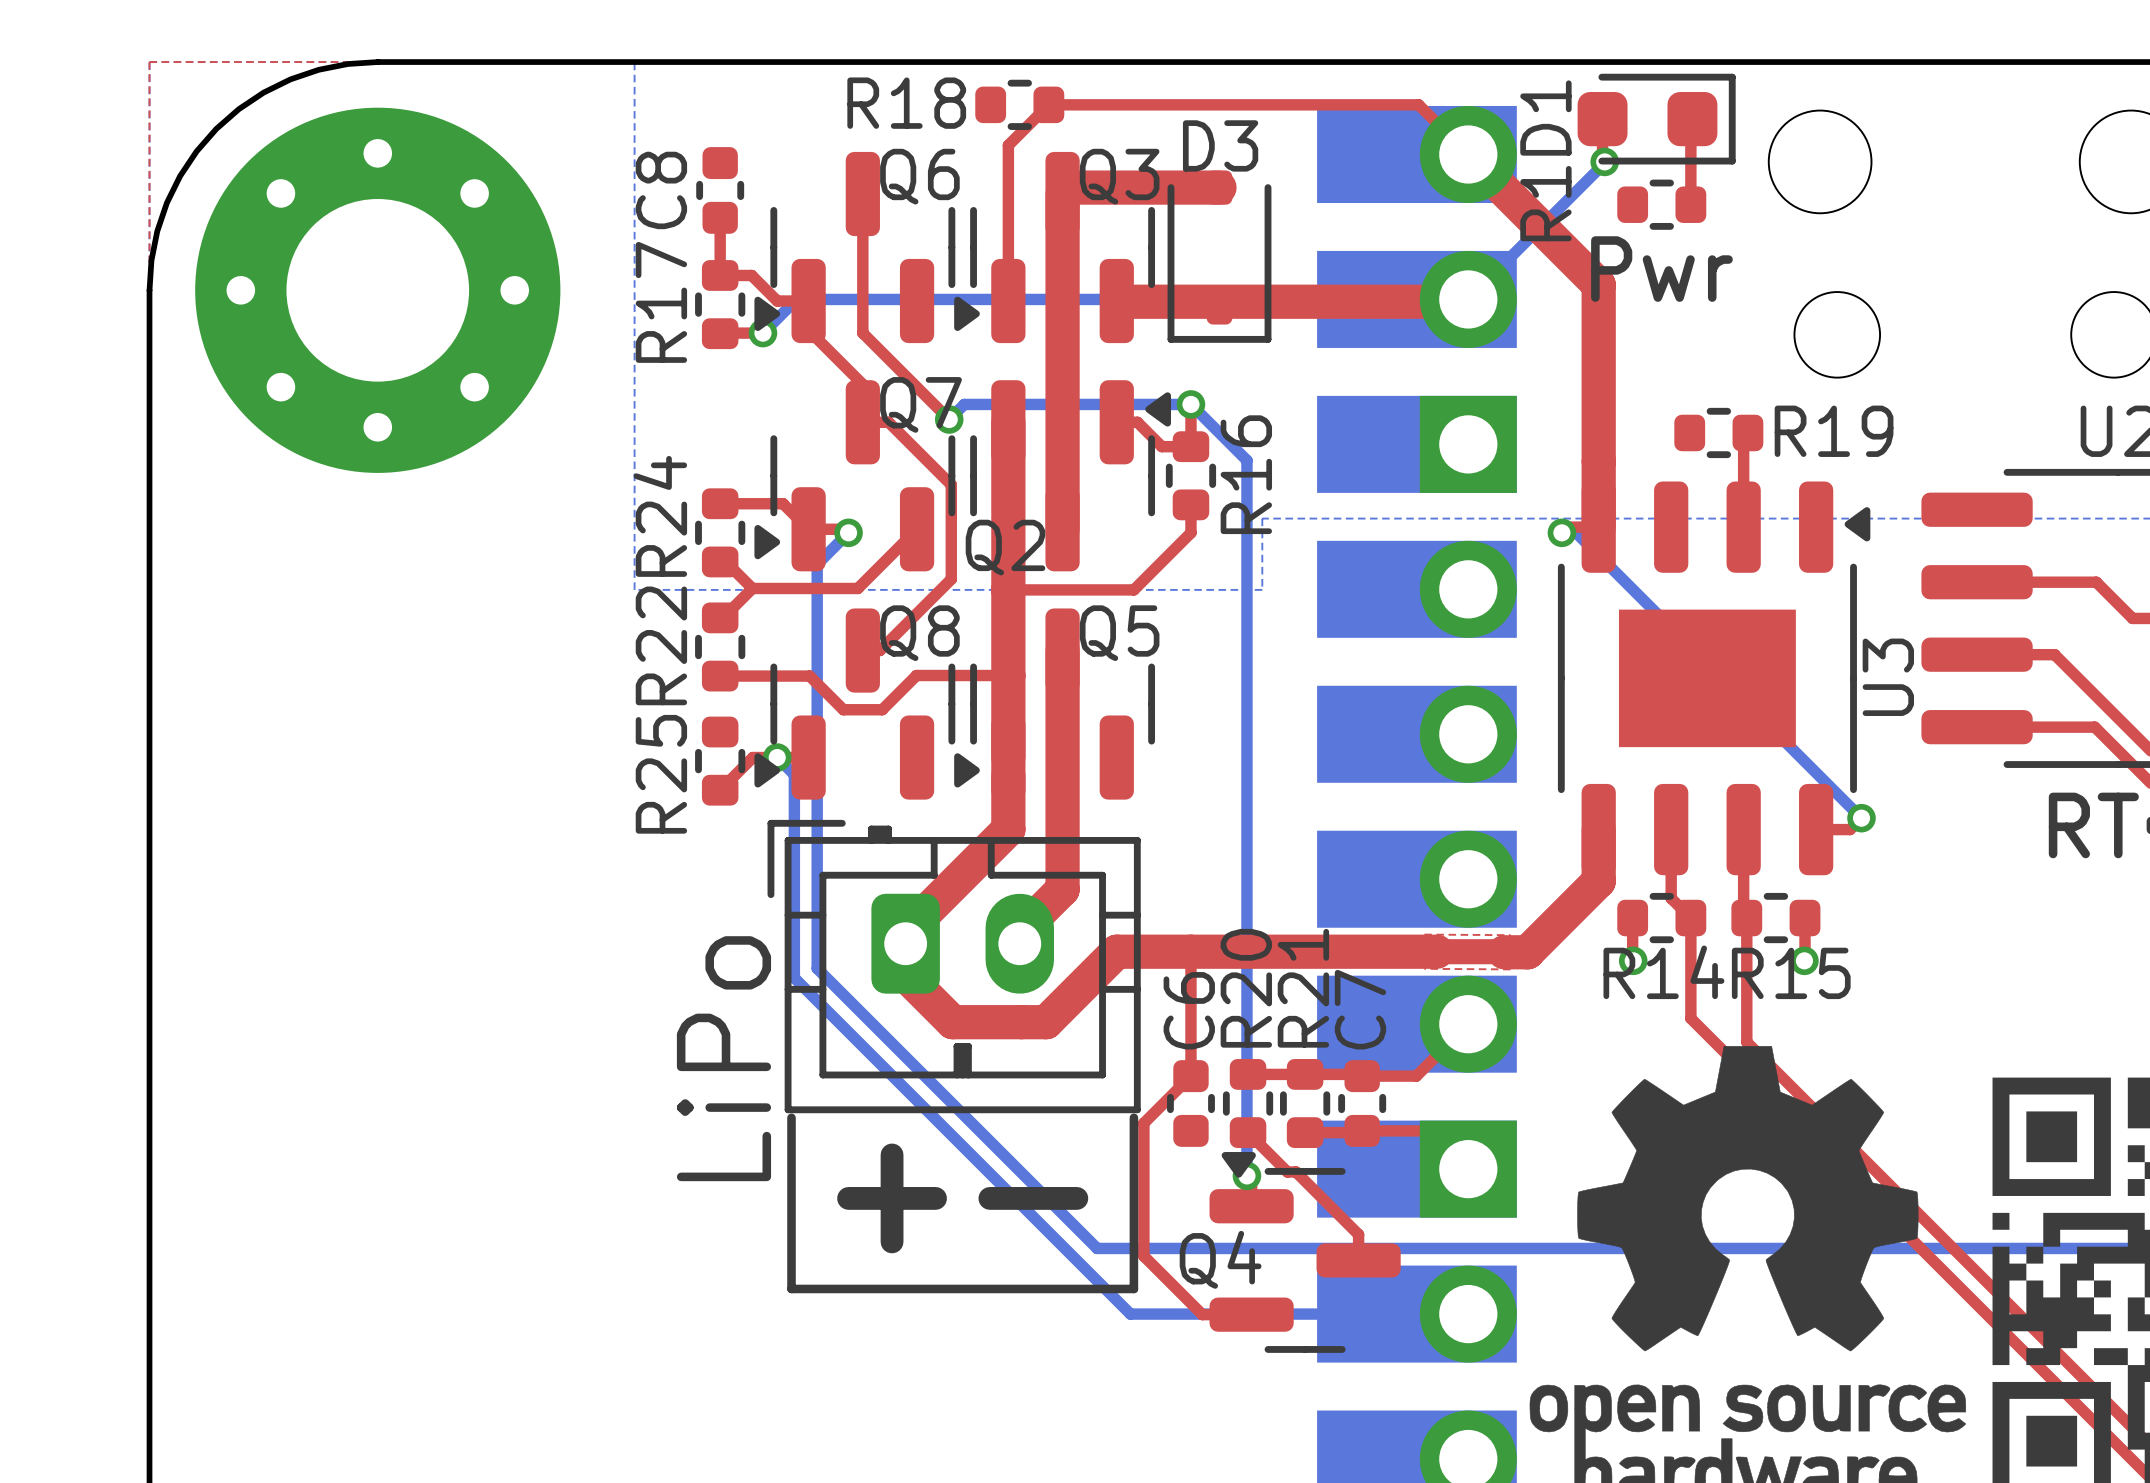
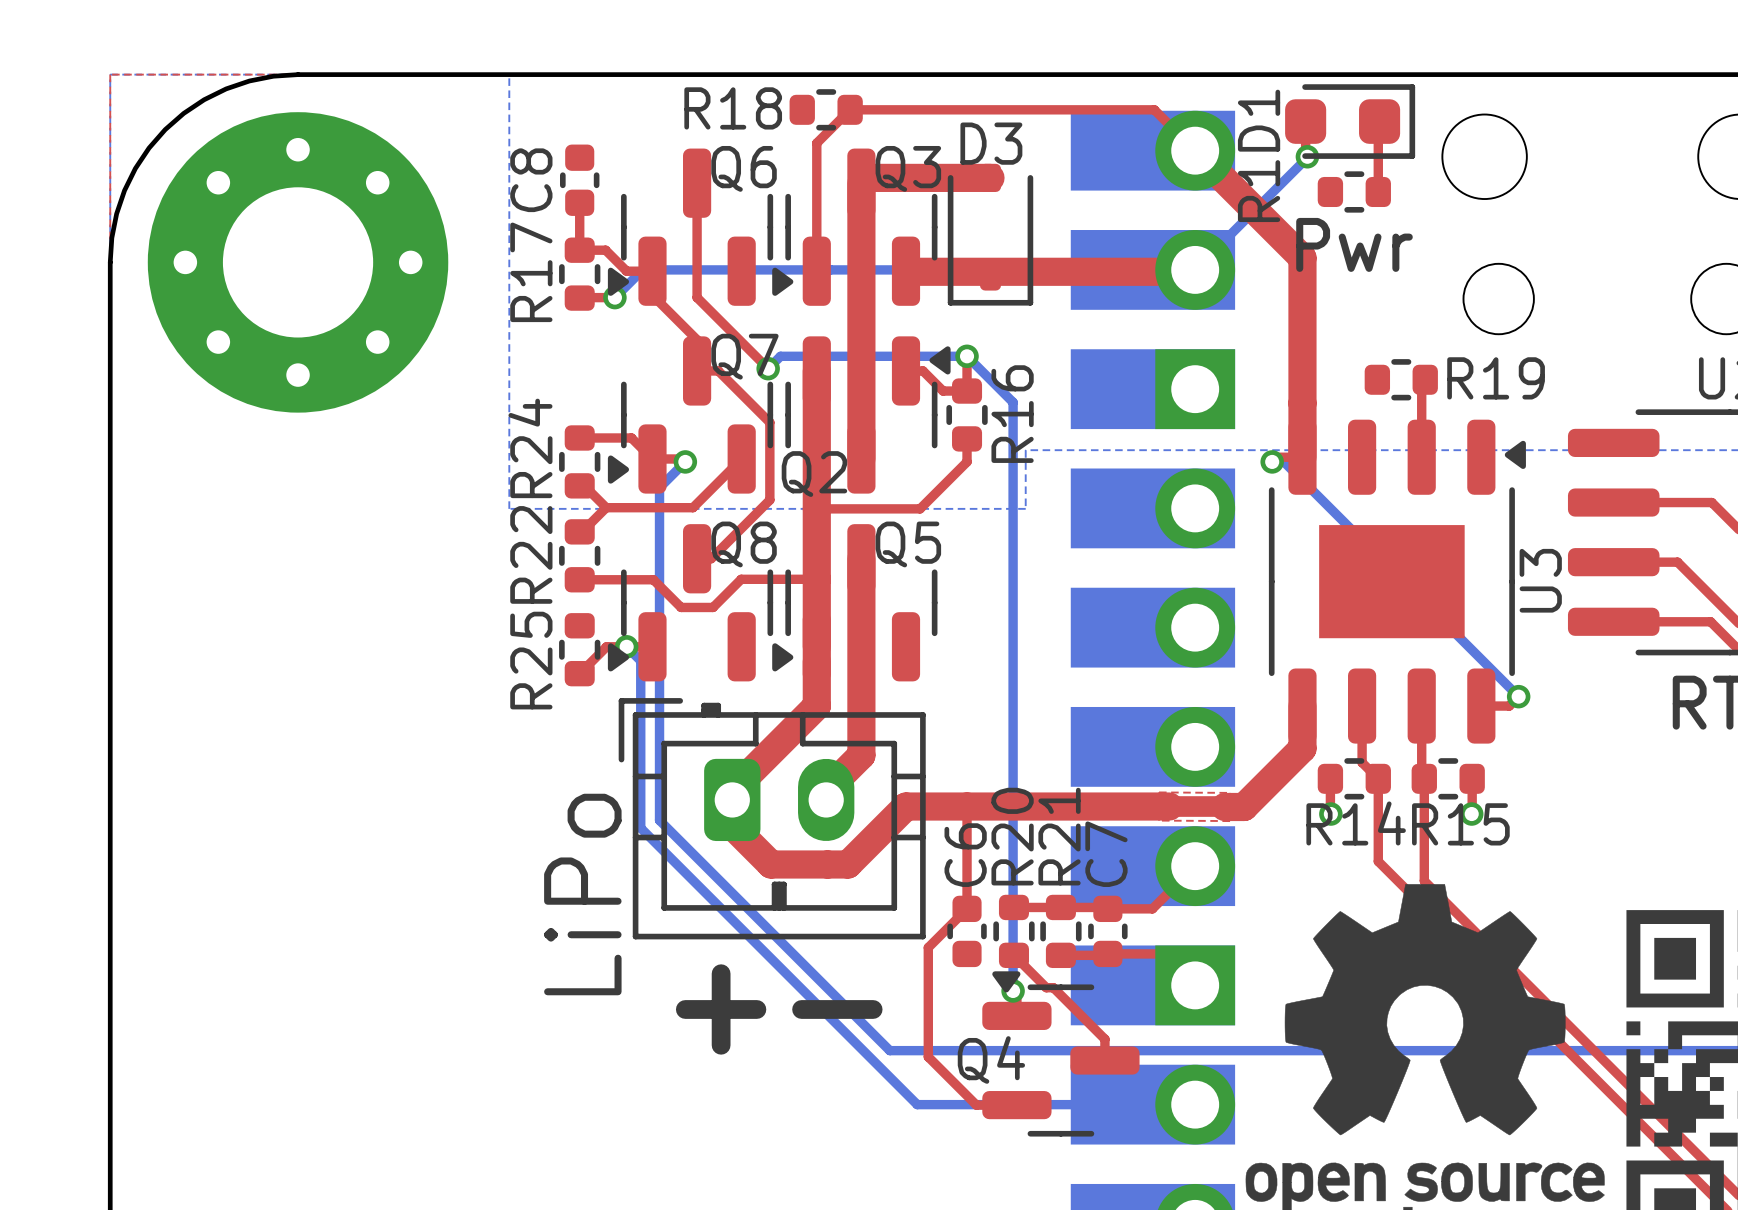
line: (791, 1117) (791, 1288) (1133, 1288) (1133, 1117) -> none

